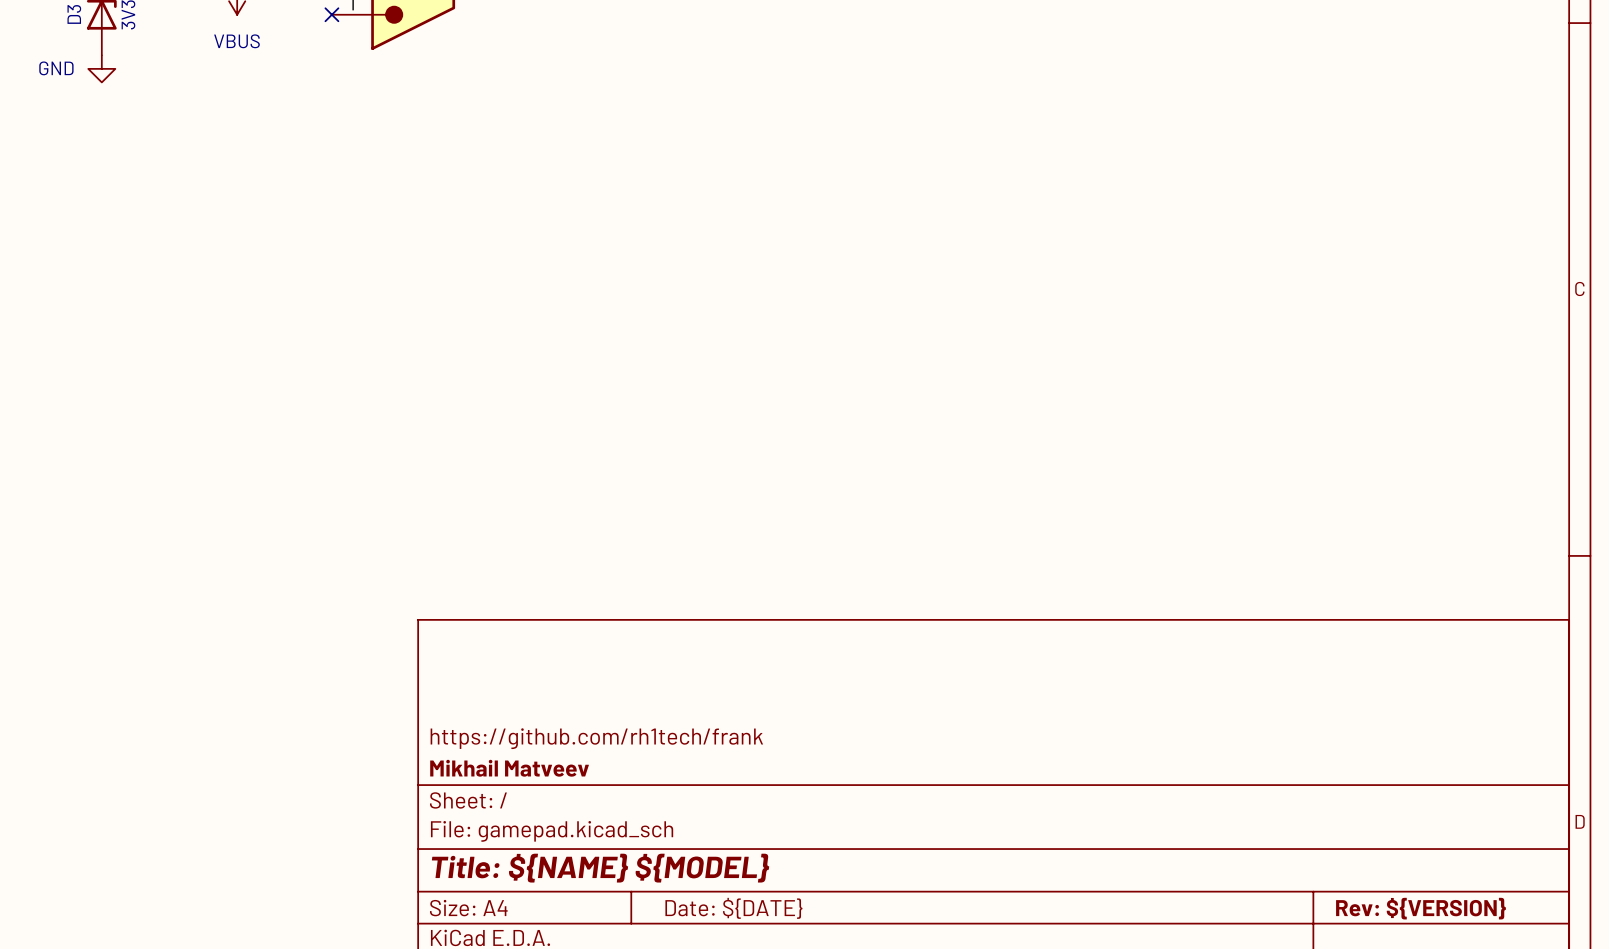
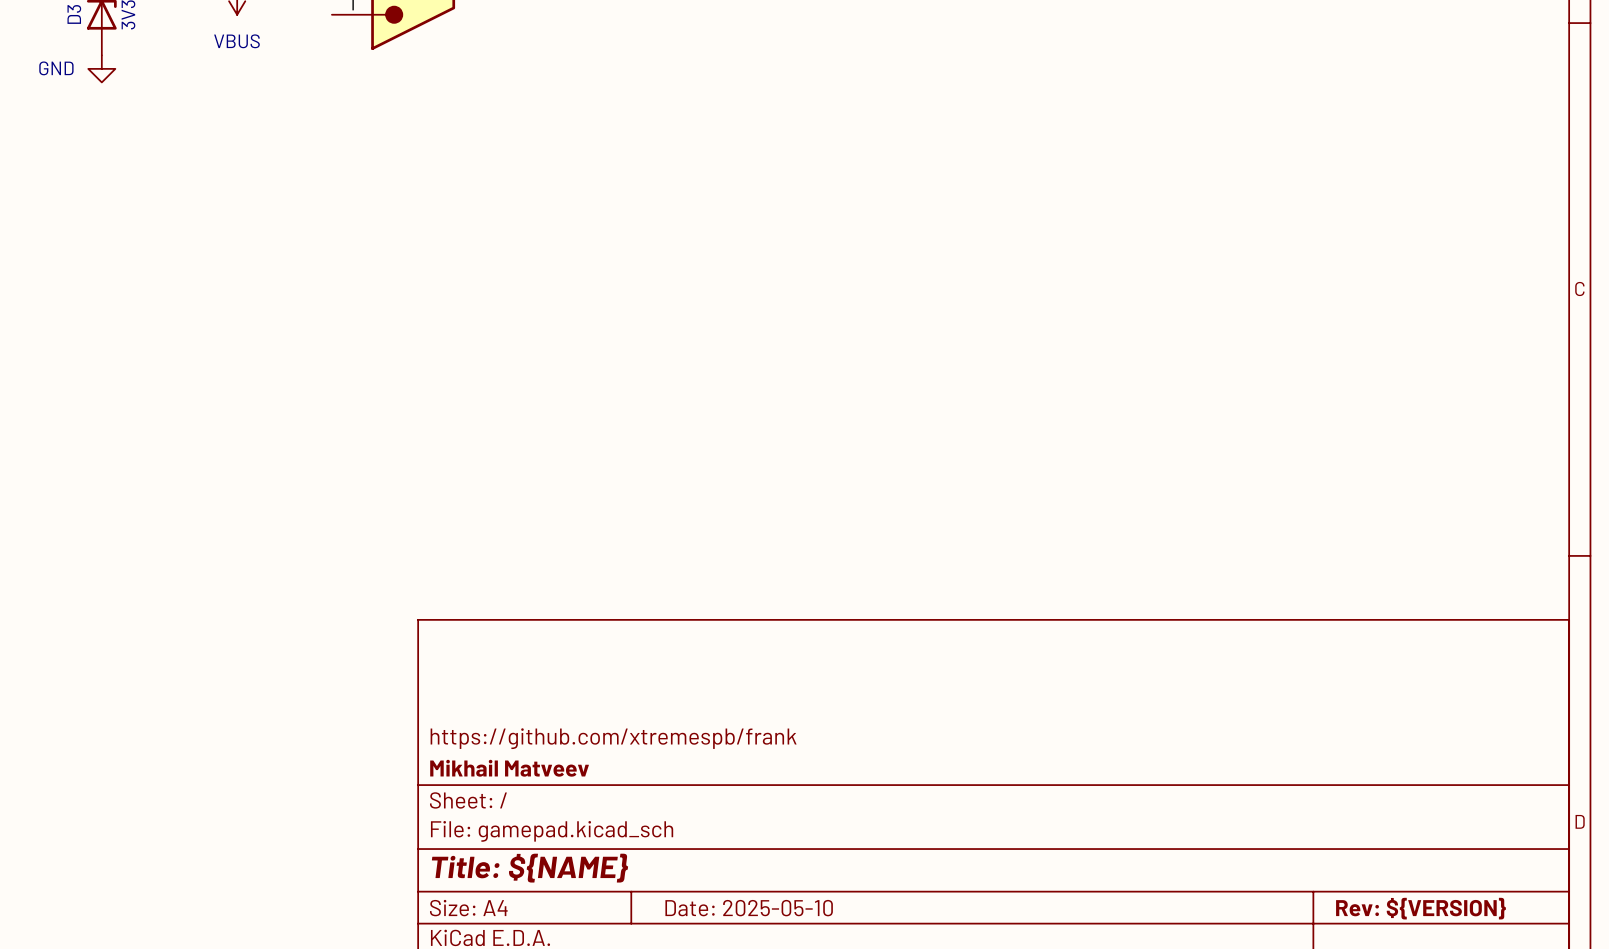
no-connect mark: (331, 14) -> none
title block: https://github.com/rh1tech/frank (596, 738) -> https://github.com/xtremespb/frank (613, 738)
title block: Title: ${NAME} ${MODEL} (600, 868) -> Title: ${NAME} (530, 868)
title block: Date: ${DATE} (733, 908) -> Date: 2025-05-10 (749, 908)

